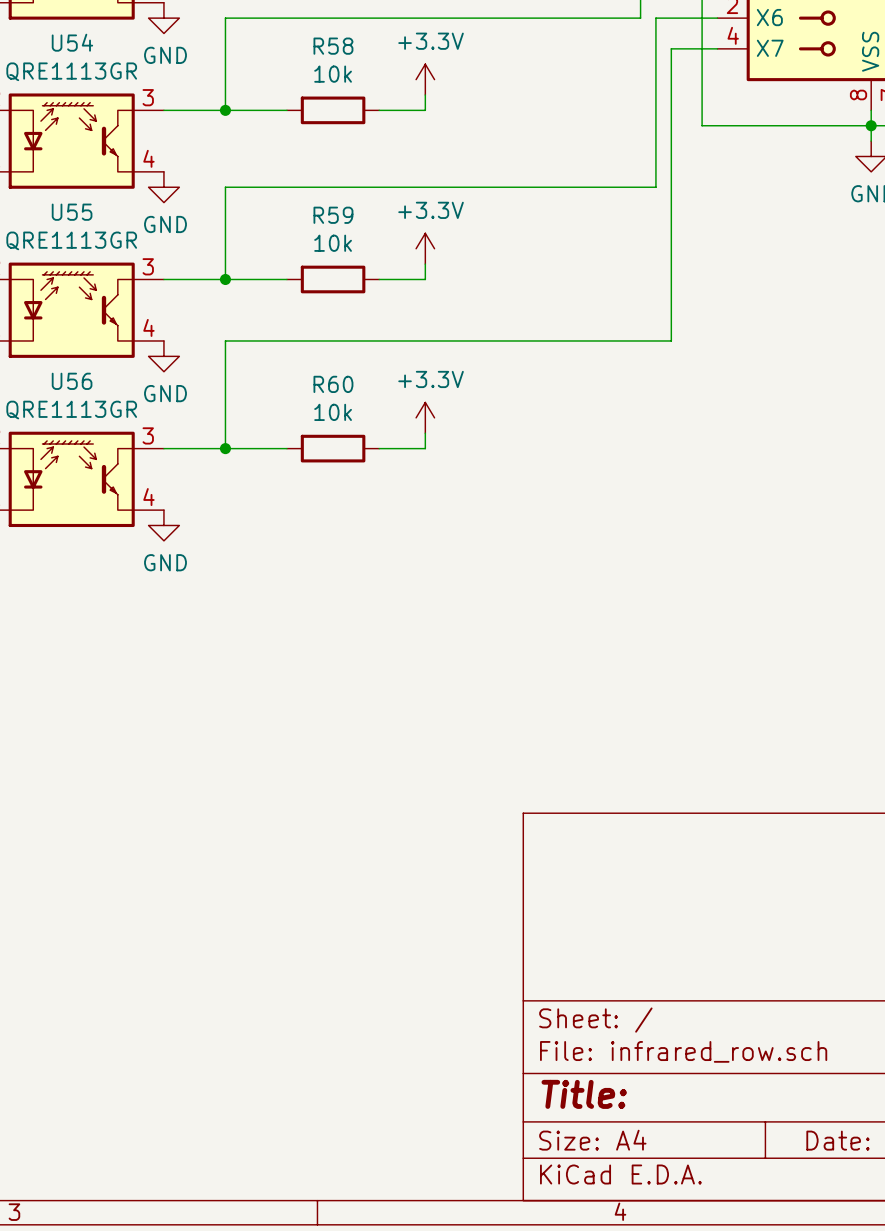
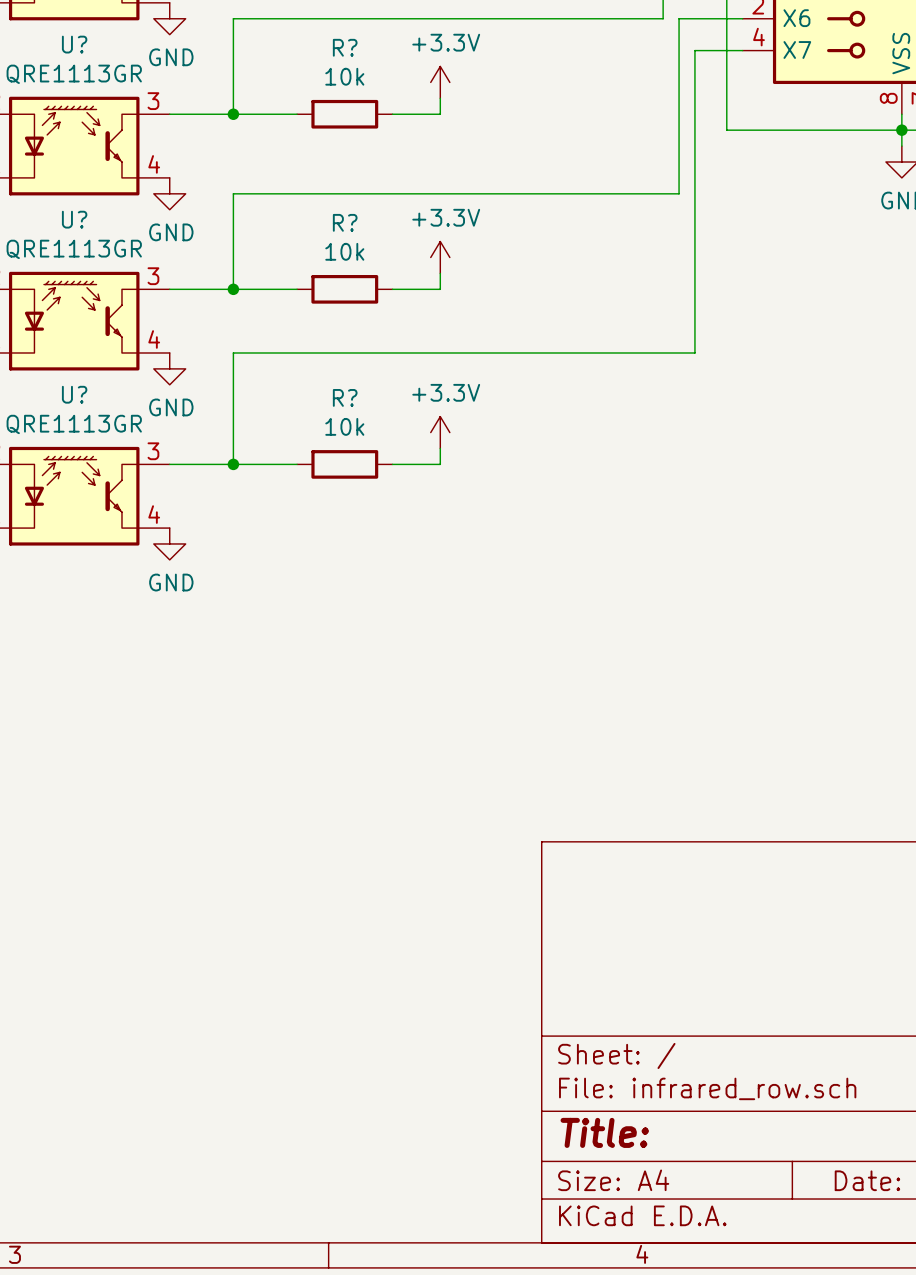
U54 name: U54 (72, 42) -> U? (74, 44)
R58 name: R58 (333, 46) -> R? (345, 47)
U55 name: U55 (72, 212) -> U? (74, 219)
R59 name: R59 (333, 215) -> R? (345, 222)
U56 name: U56 (72, 381) -> U? (74, 394)
R60 name: R60 (333, 384) -> R? (345, 397)

